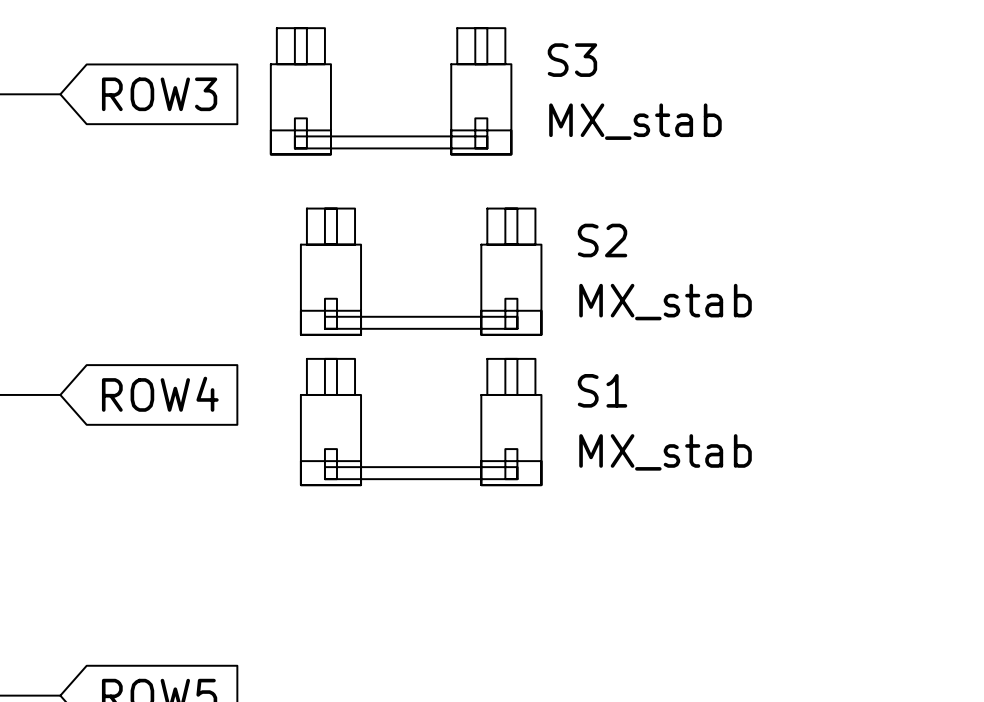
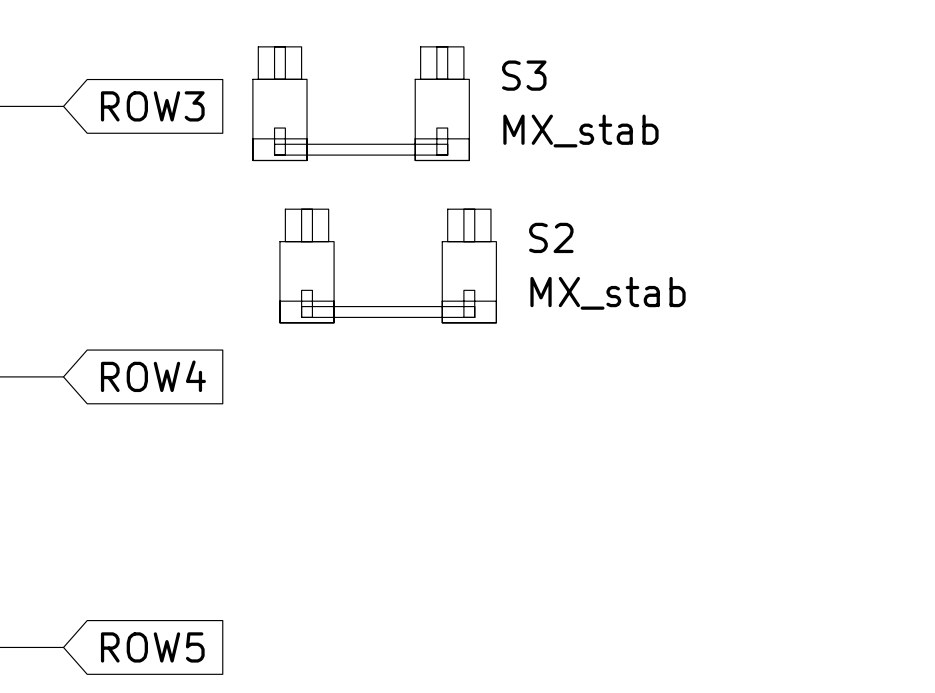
S1: MX_stab (421, 422) -> none

